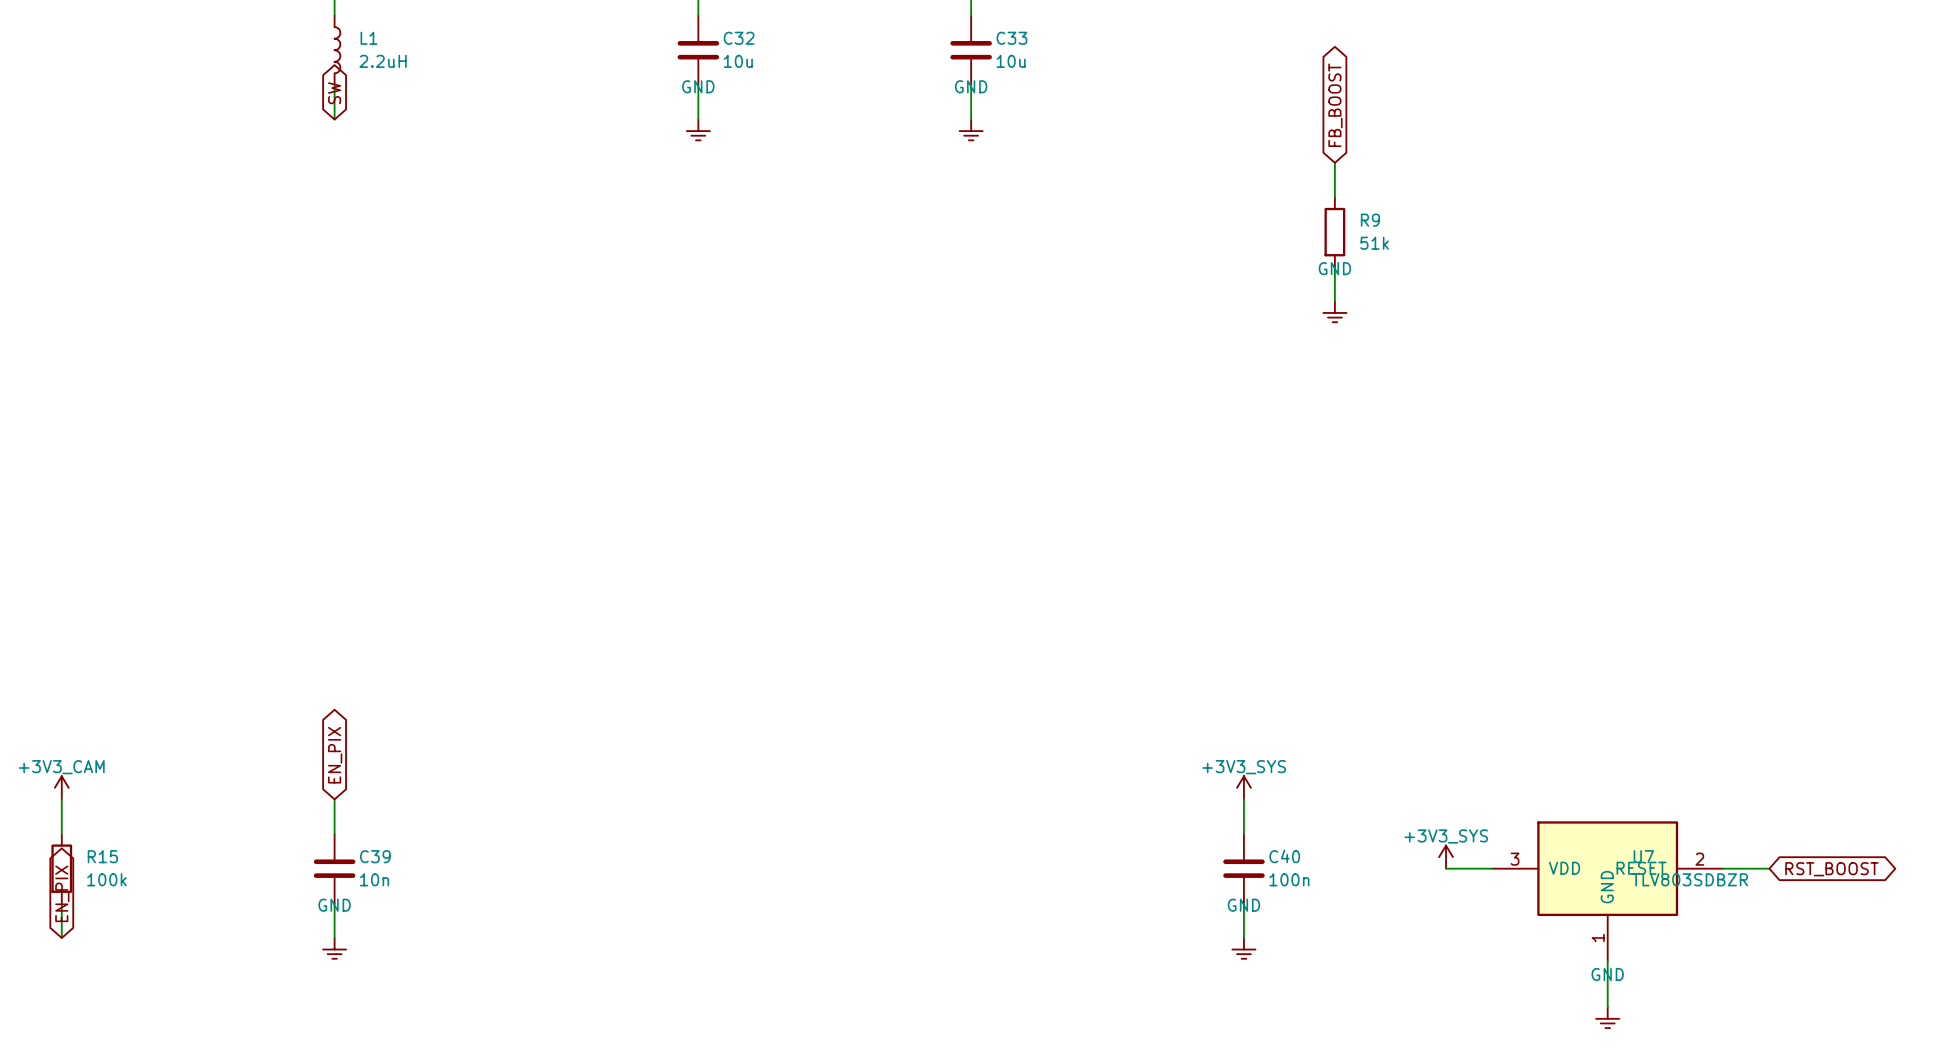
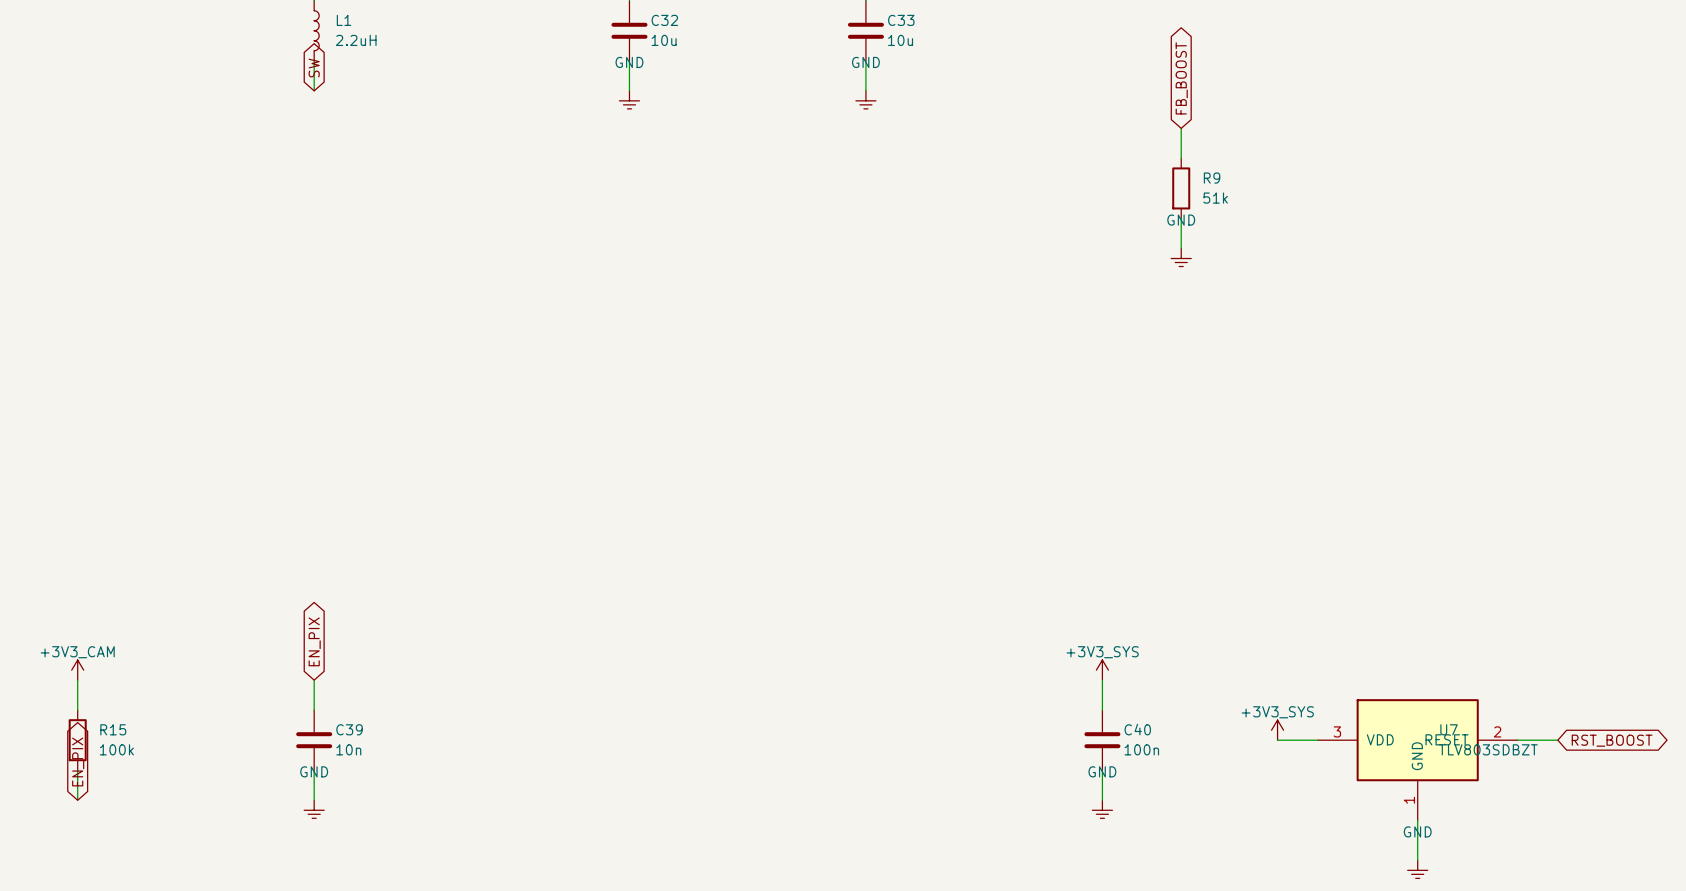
U7 value: TLV803SDBZR (1690, 879) -> TLV803SDBZT (1488, 749)

